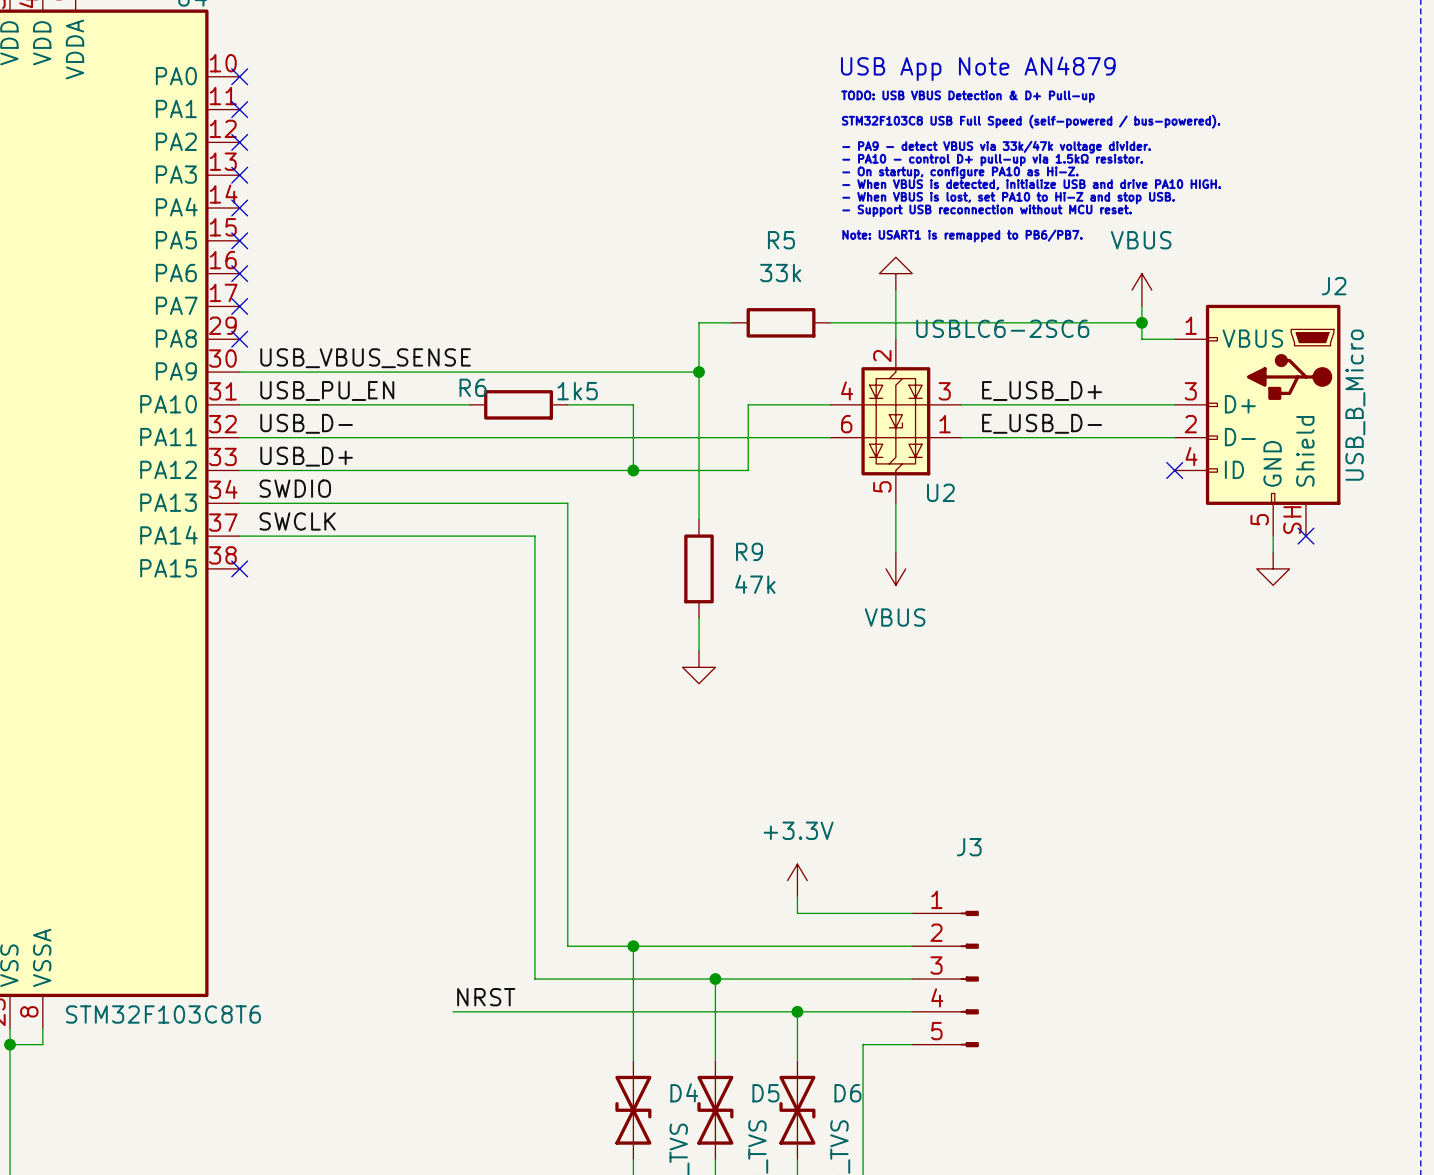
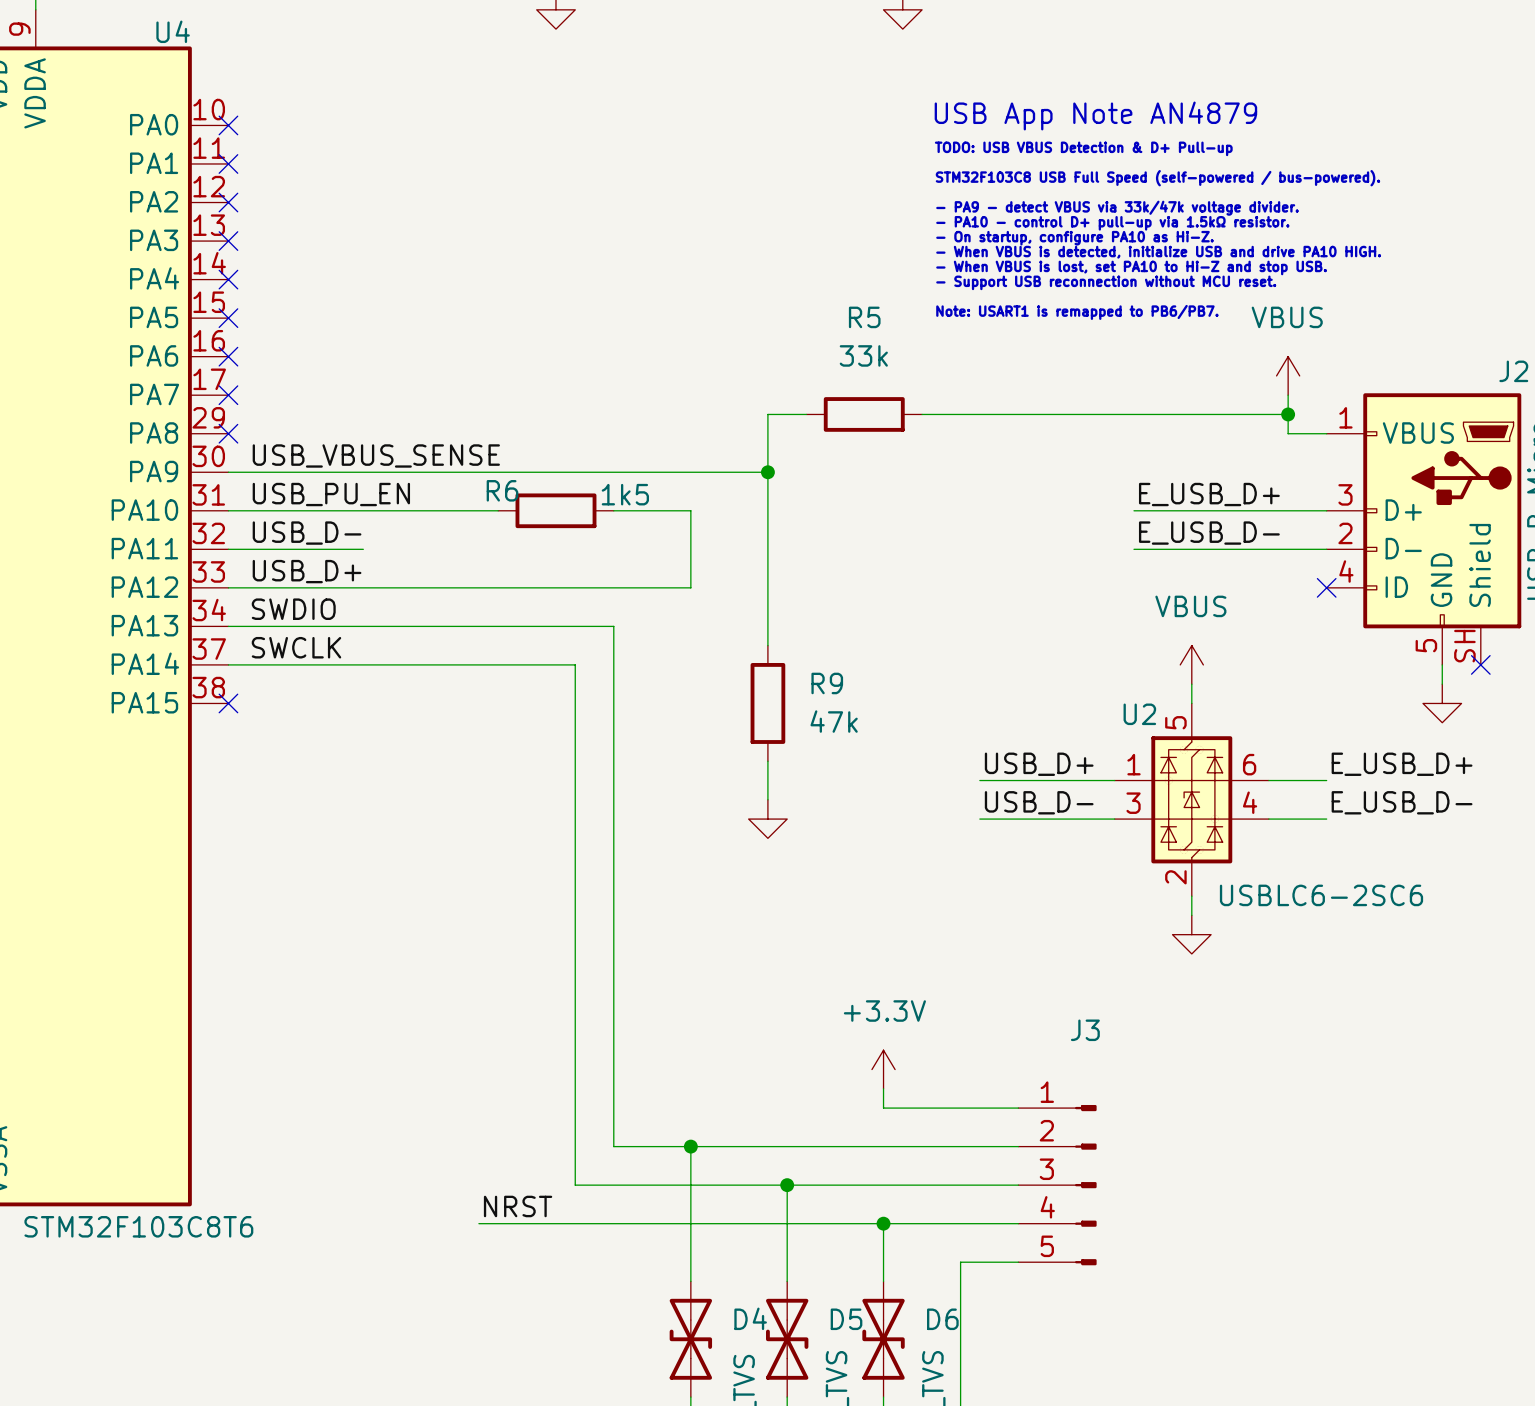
power symbol: (895, 273) -> none
wire: (895, 290) (895, 339) -> none
U2 value position: USBLC6-2SC6 (1002, 328) -> USBLC6-2SC6 (1321, 895)
label position: E_USB_D+ (1042, 391) -> E_USB_D+ (1209, 494)
wire: (830, 404) (748, 404) (748, 470) (633, 470) -> none
wire: (961, 404) (1010, 404) -> (1268, 780) (1326, 780)
U2 rotation: 0° (895, 421) -> 180° (1191, 799)
U2 position: (895, 421) -> (1191, 799)
label position: E_USB_D- (1042, 423) -> E_USB_D- (1209, 533)
wire: (354, 437) (830, 437) -> none
wire: (961, 437) (1010, 437) -> (1268, 819) (1326, 819)
junction: (633, 470) -> none
wire: (895, 503) (895, 552) -> none
wire: none -> (1191, 684) (1191, 703)
power symbol rotation: 0° (895, 568) -> 180° (1191, 664)
power symbol position: VBUS (895, 568) -> VBUS (1191, 664)
label: none -> USB_D+ (1039, 764)
label: none -> E_USB_D+ (1402, 764)
wire: none -> (979, 780) (1114, 780)
label: none -> USB_D- (1039, 802)
label: none -> E_USB_D- (1402, 802)
wire: none -> (979, 819) (1114, 819)
wire: none -> (1191, 896) (1191, 915)
power symbol: none -> (1191, 934)

